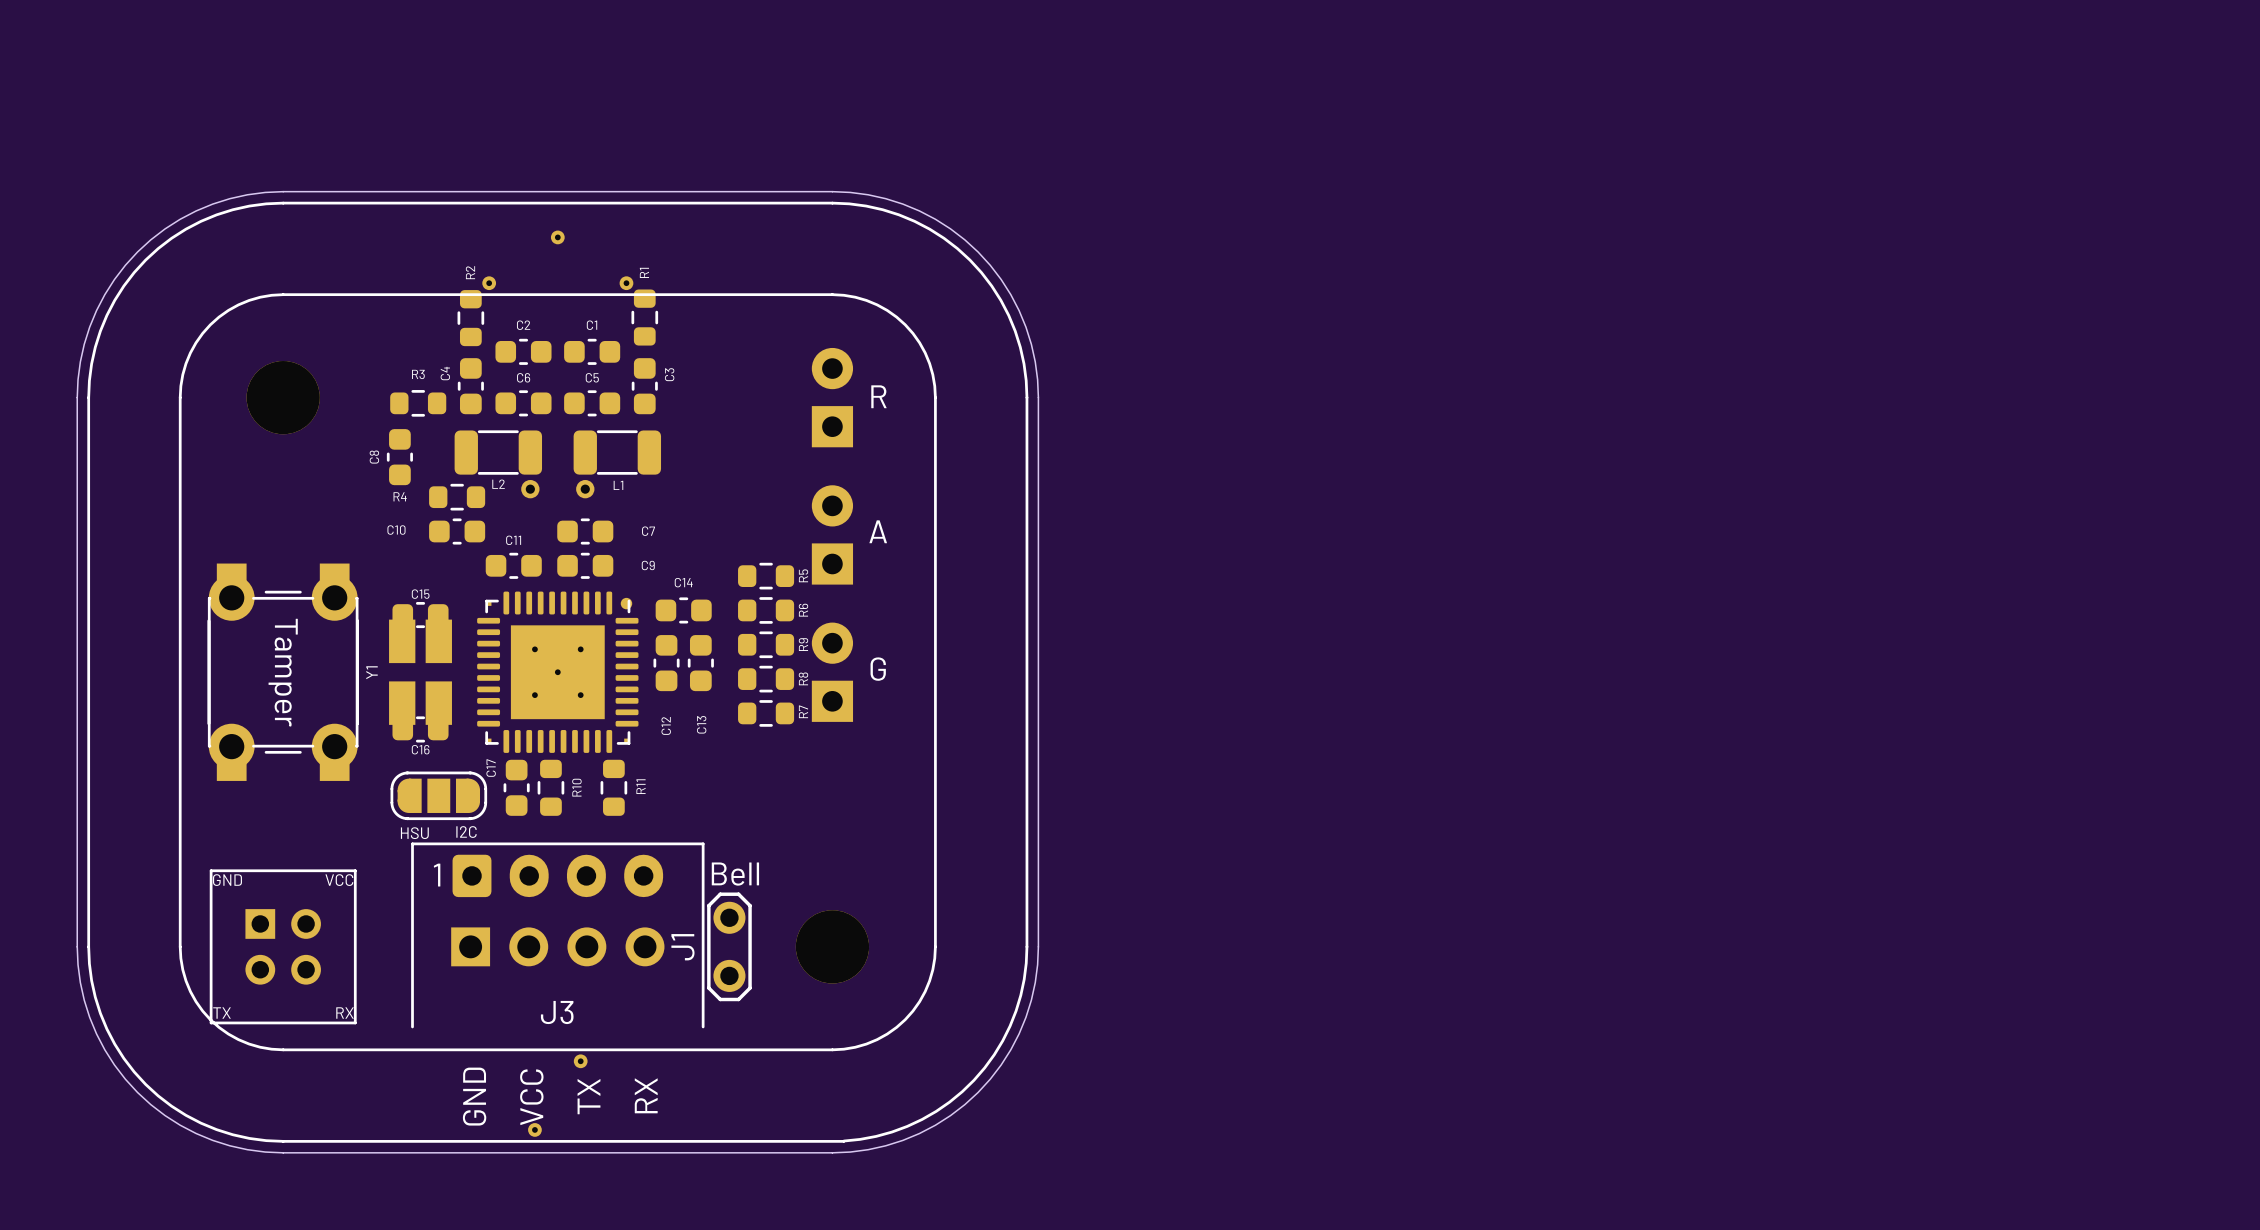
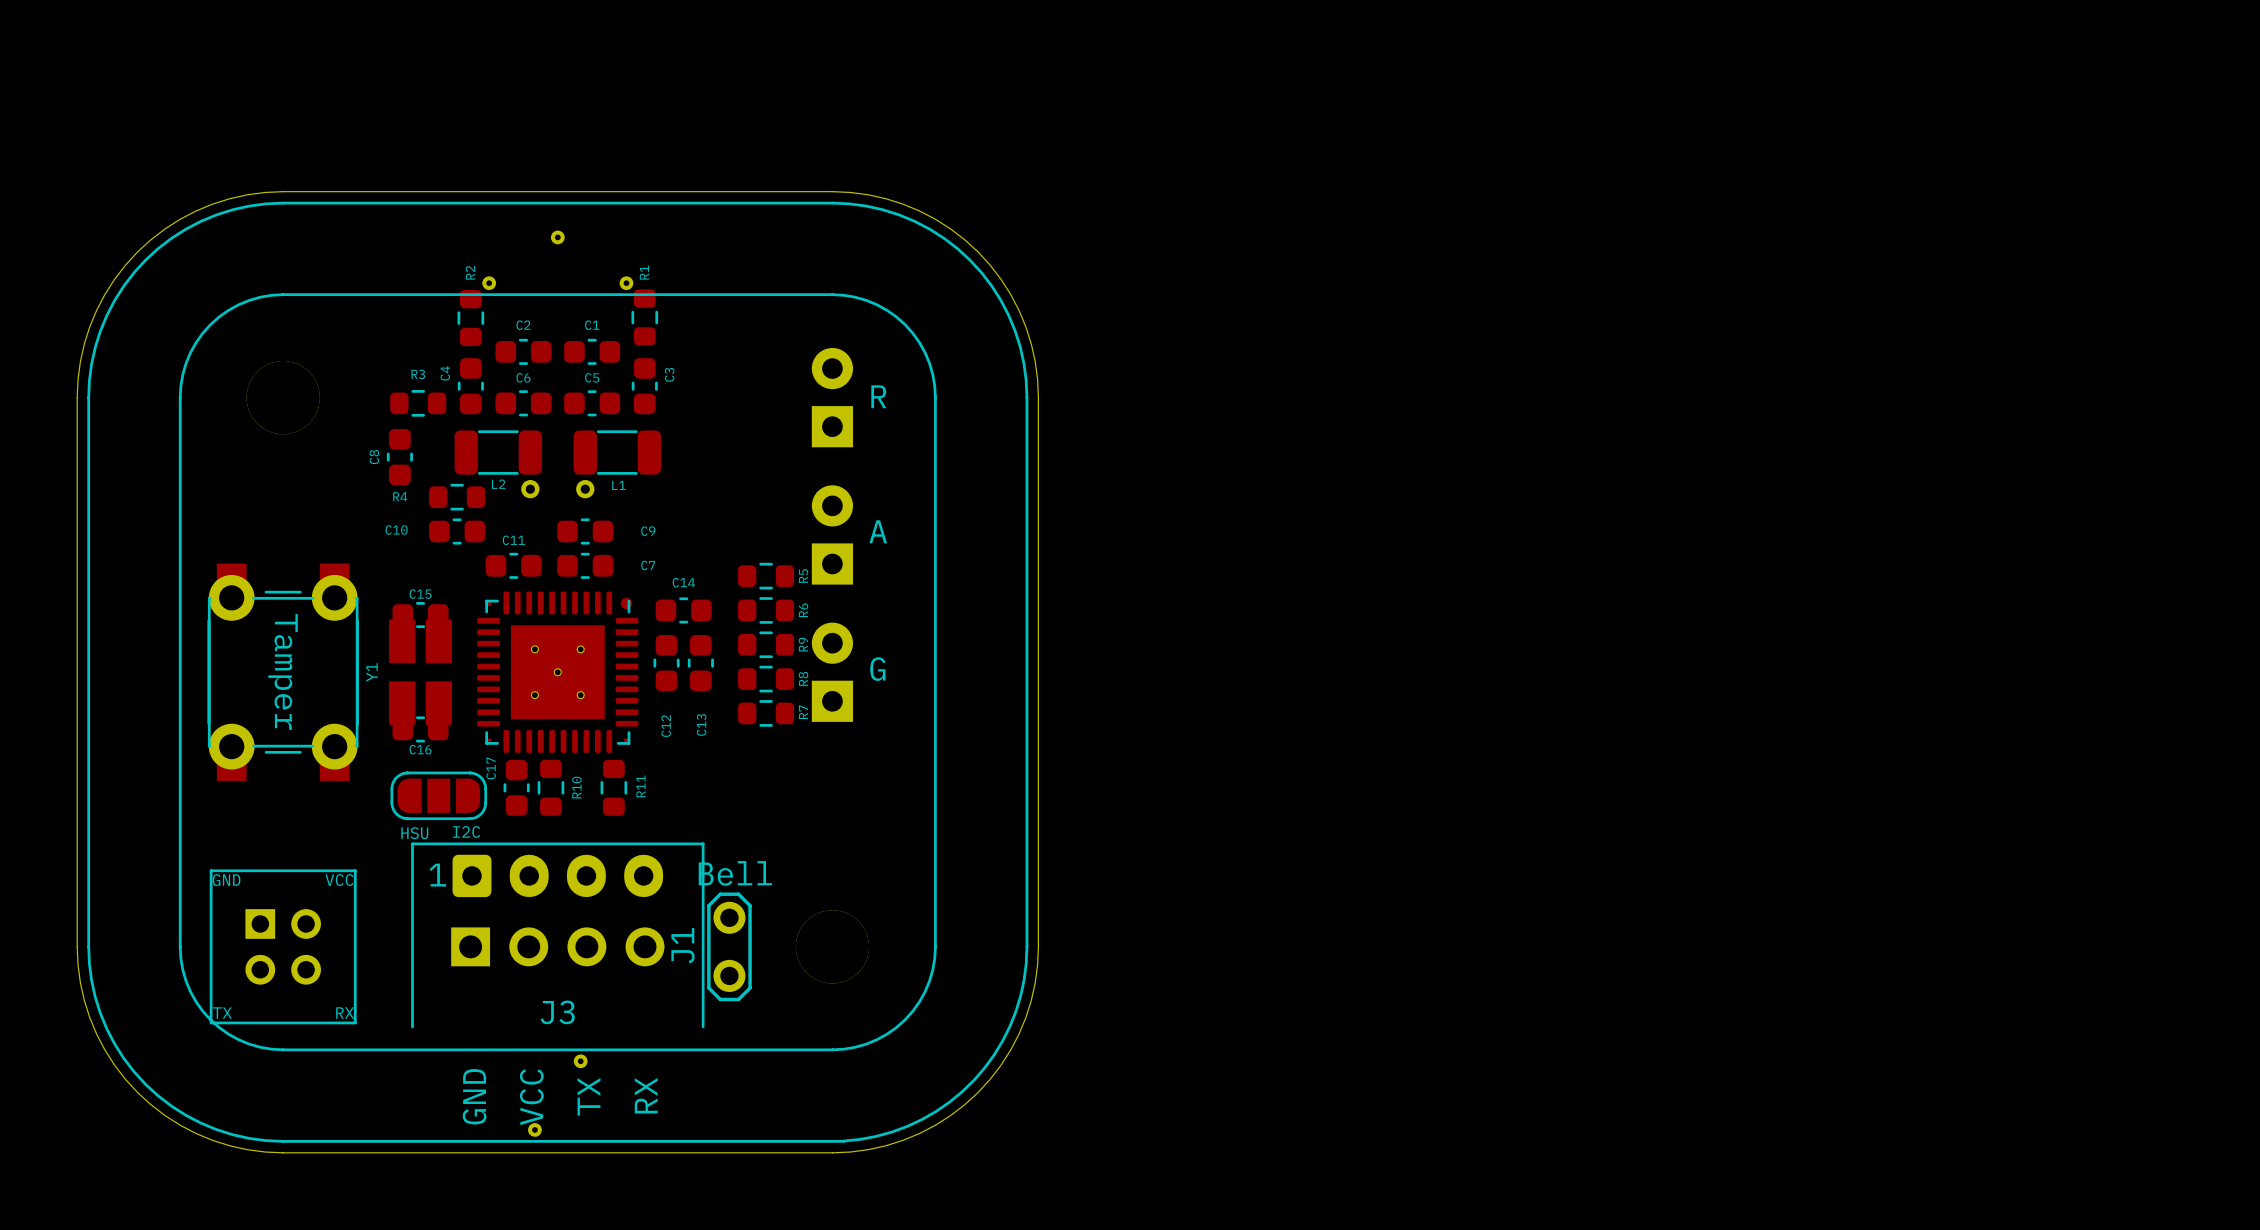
C7 name: C7 (648, 531) -> C9 (648, 531)
C9 name: C9 (648, 565) -> C7 (648, 565)

